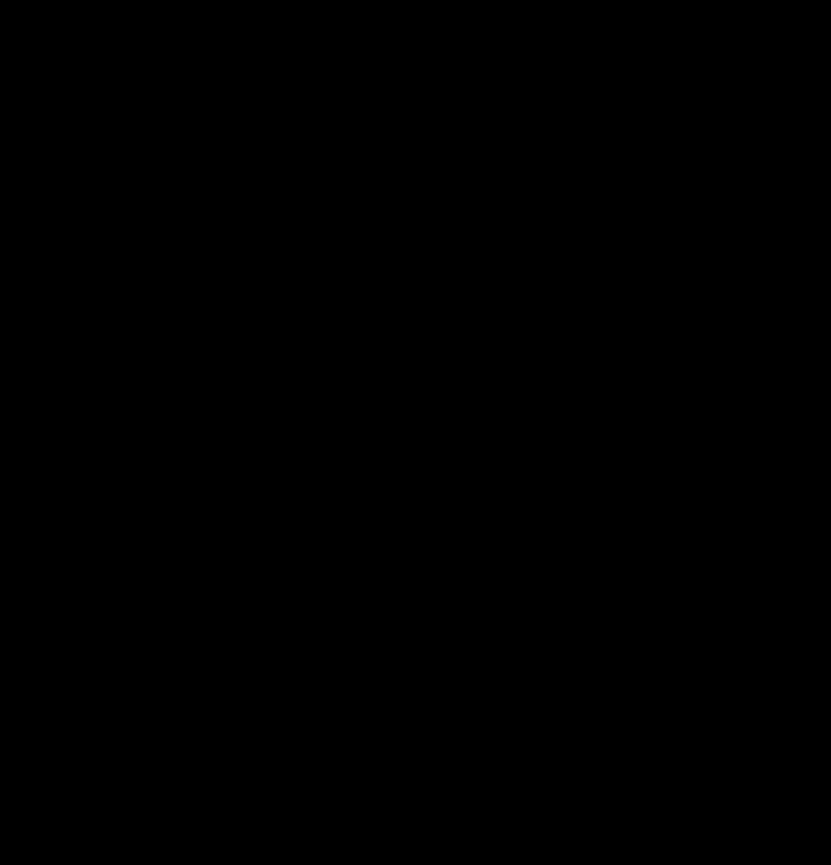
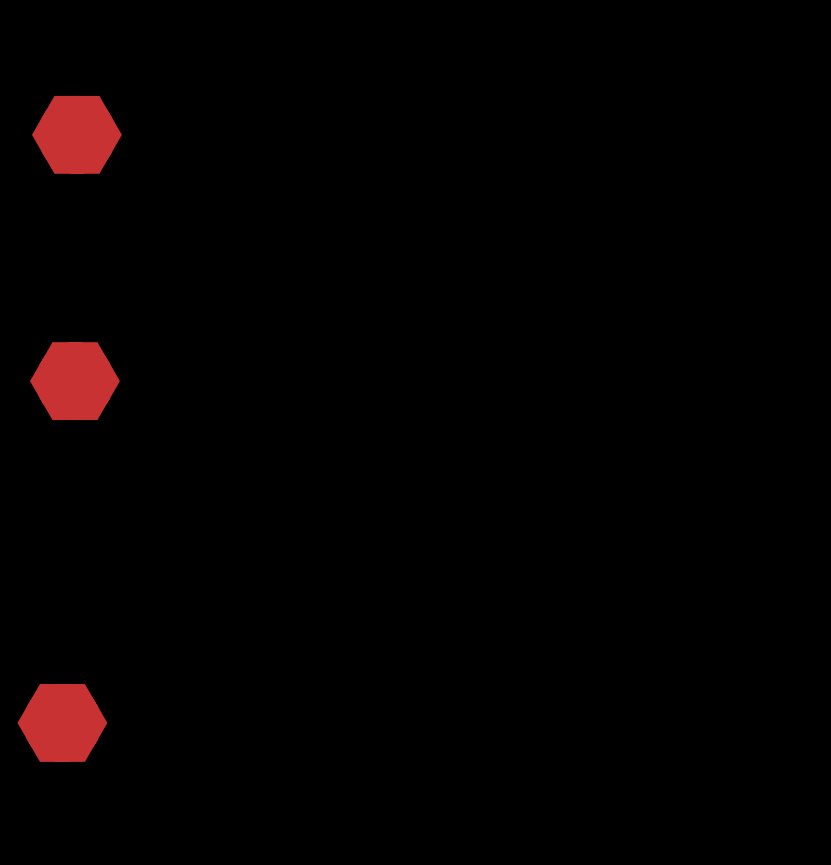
part: none -> (76, 134)
part: none -> (74, 381)
part: none -> (62, 722)

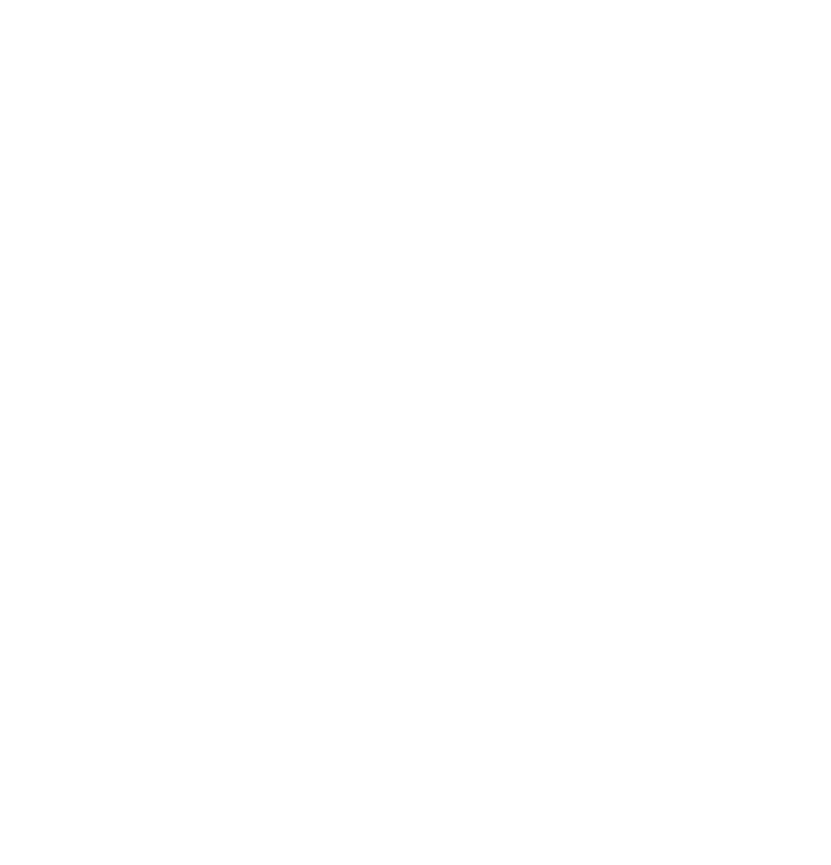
part: (76, 134) -> none
part: (74, 381) -> none
part: (62, 722) -> none

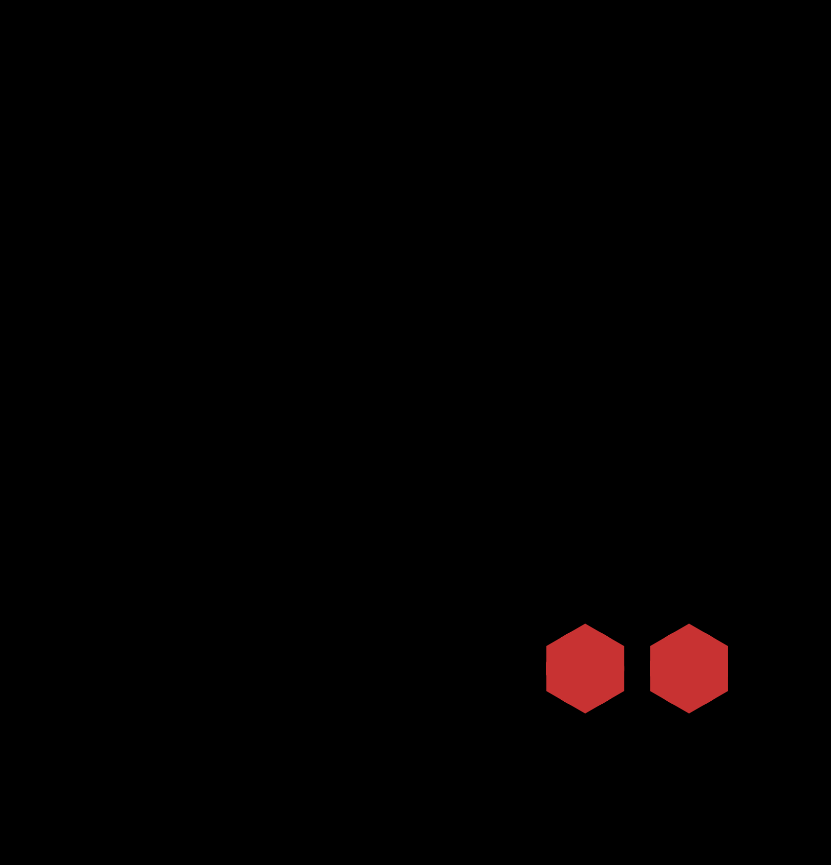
part: none -> (585, 668)
part: none -> (689, 668)

